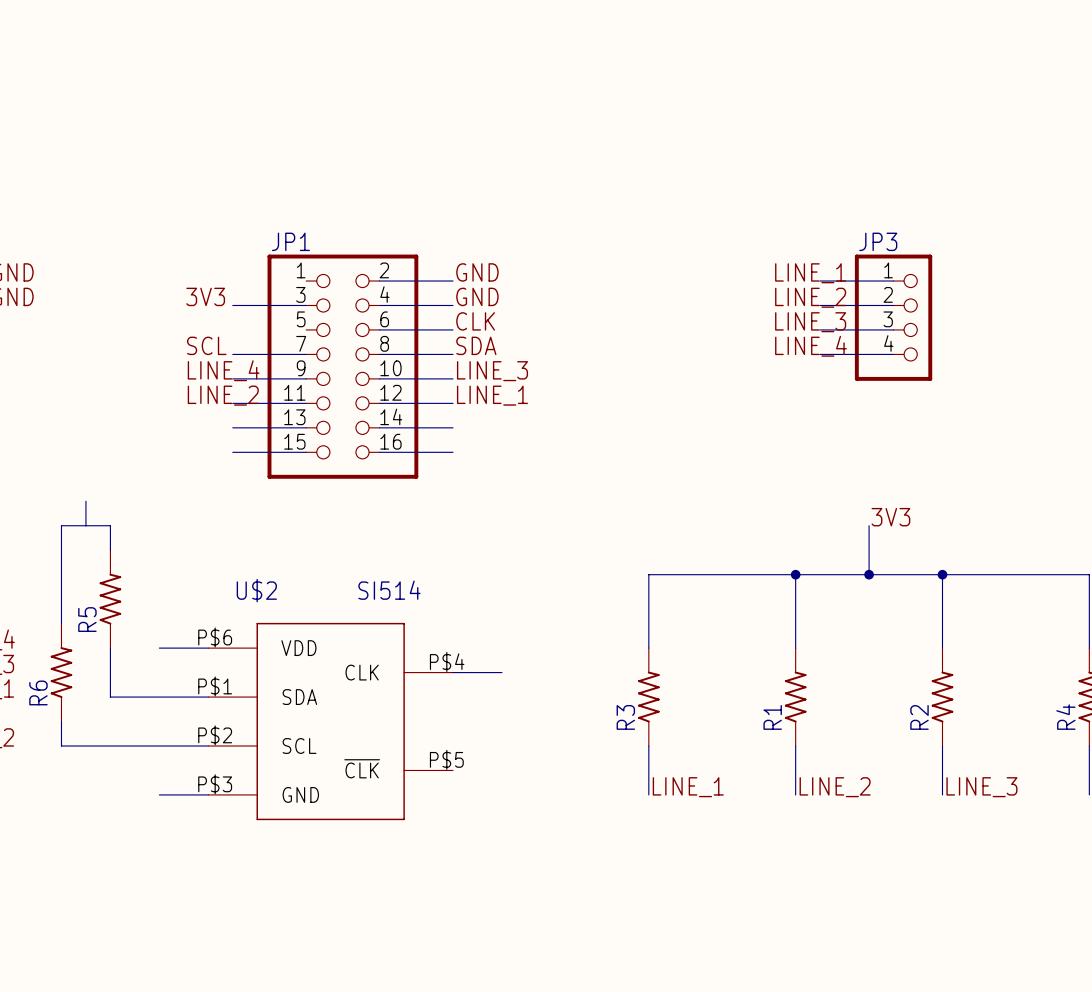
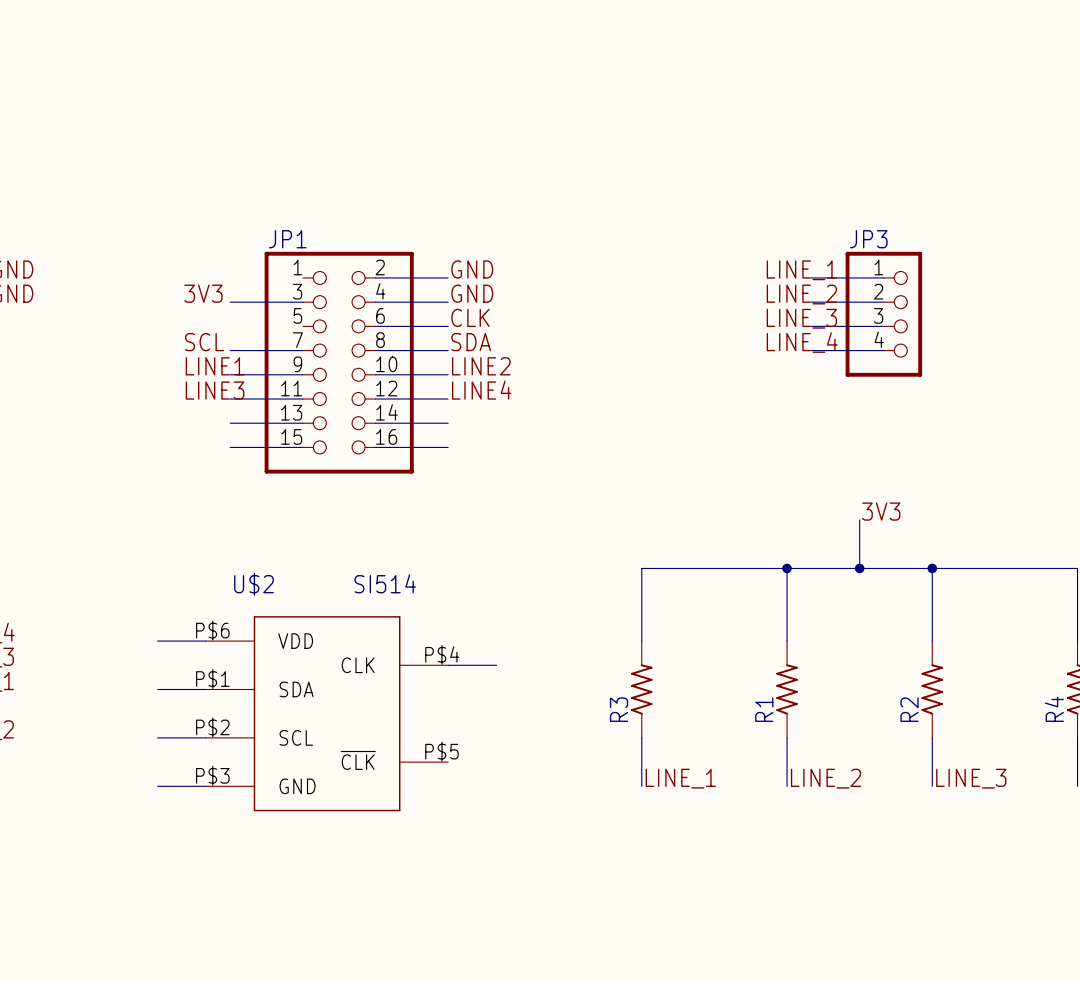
label: LINE_4 (223, 370) -> LINE1 (215, 366)
label: LINE_3 (492, 371) -> LINE2 (481, 366)
label: LINE_2 (223, 395) -> LINE3 (215, 390)
label: LINE_1 (492, 395) -> LINE4 (481, 390)
wire: (85, 501) (85, 525) -> none
wire: (110, 550) (110, 525) (61, 525) (61, 623) -> none
R5: (110, 599) -> none
wire: (110, 648) (110, 697) (159, 697) -> none
R6: (61, 672) -> none
wire: (61, 721) (61, 745) (159, 745) -> none

